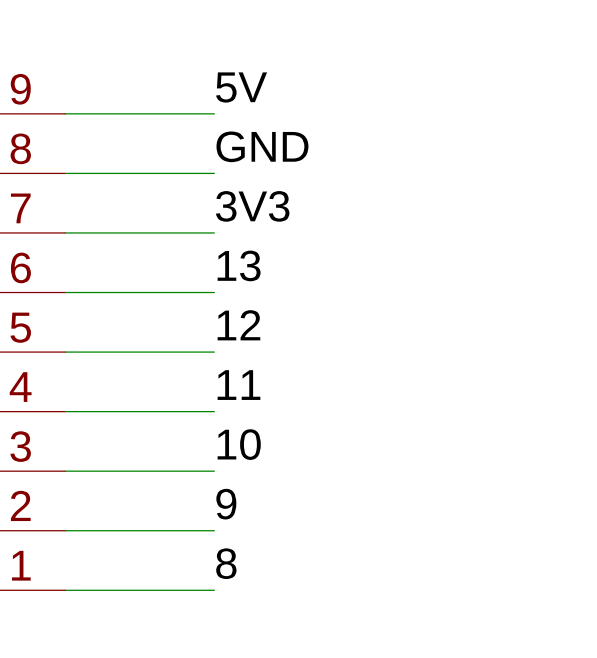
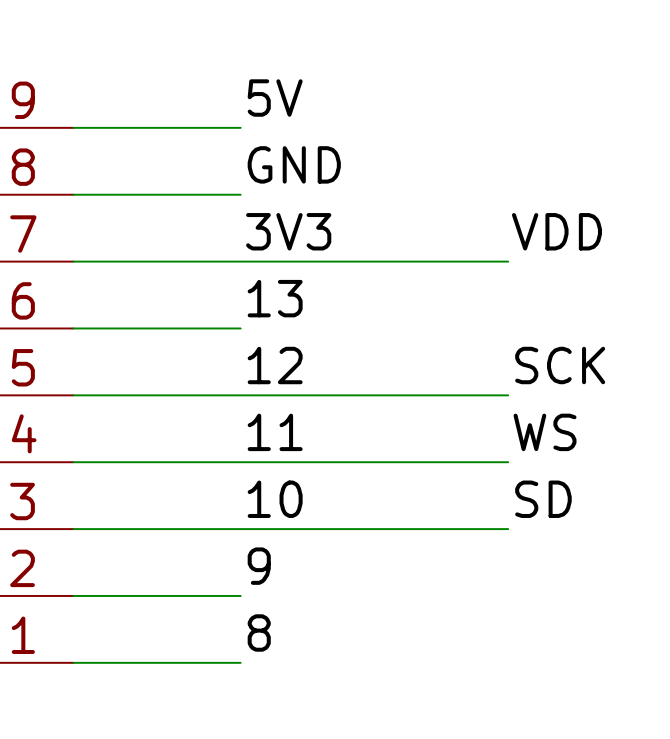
label: none -> VDD (556, 231)
wire: none -> (240, 261) (508, 261)
label: none -> SCK (560, 365)
wire: none -> (240, 395) (508, 395)
label: none -> WS (545, 432)
wire: none -> (240, 462) (508, 462)
label: none -> SD (543, 499)
wire: none -> (240, 529) (508, 529)

